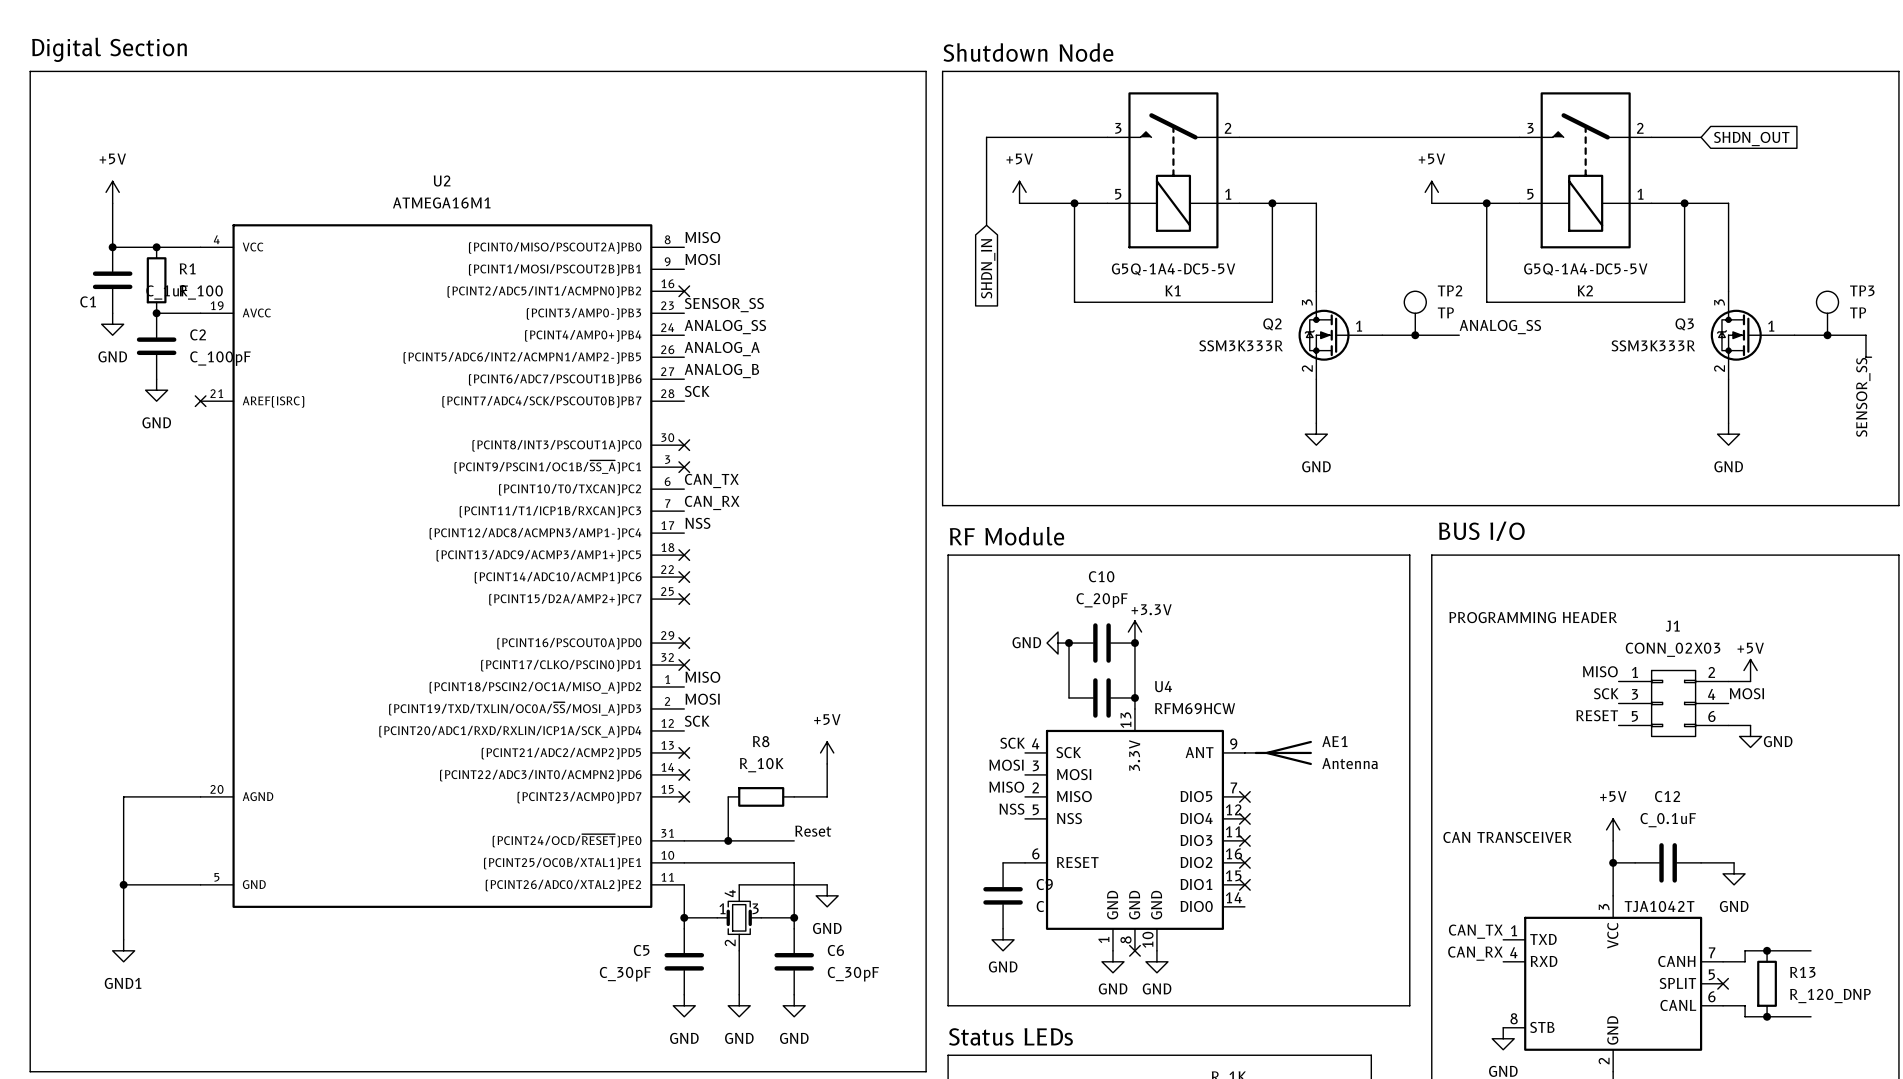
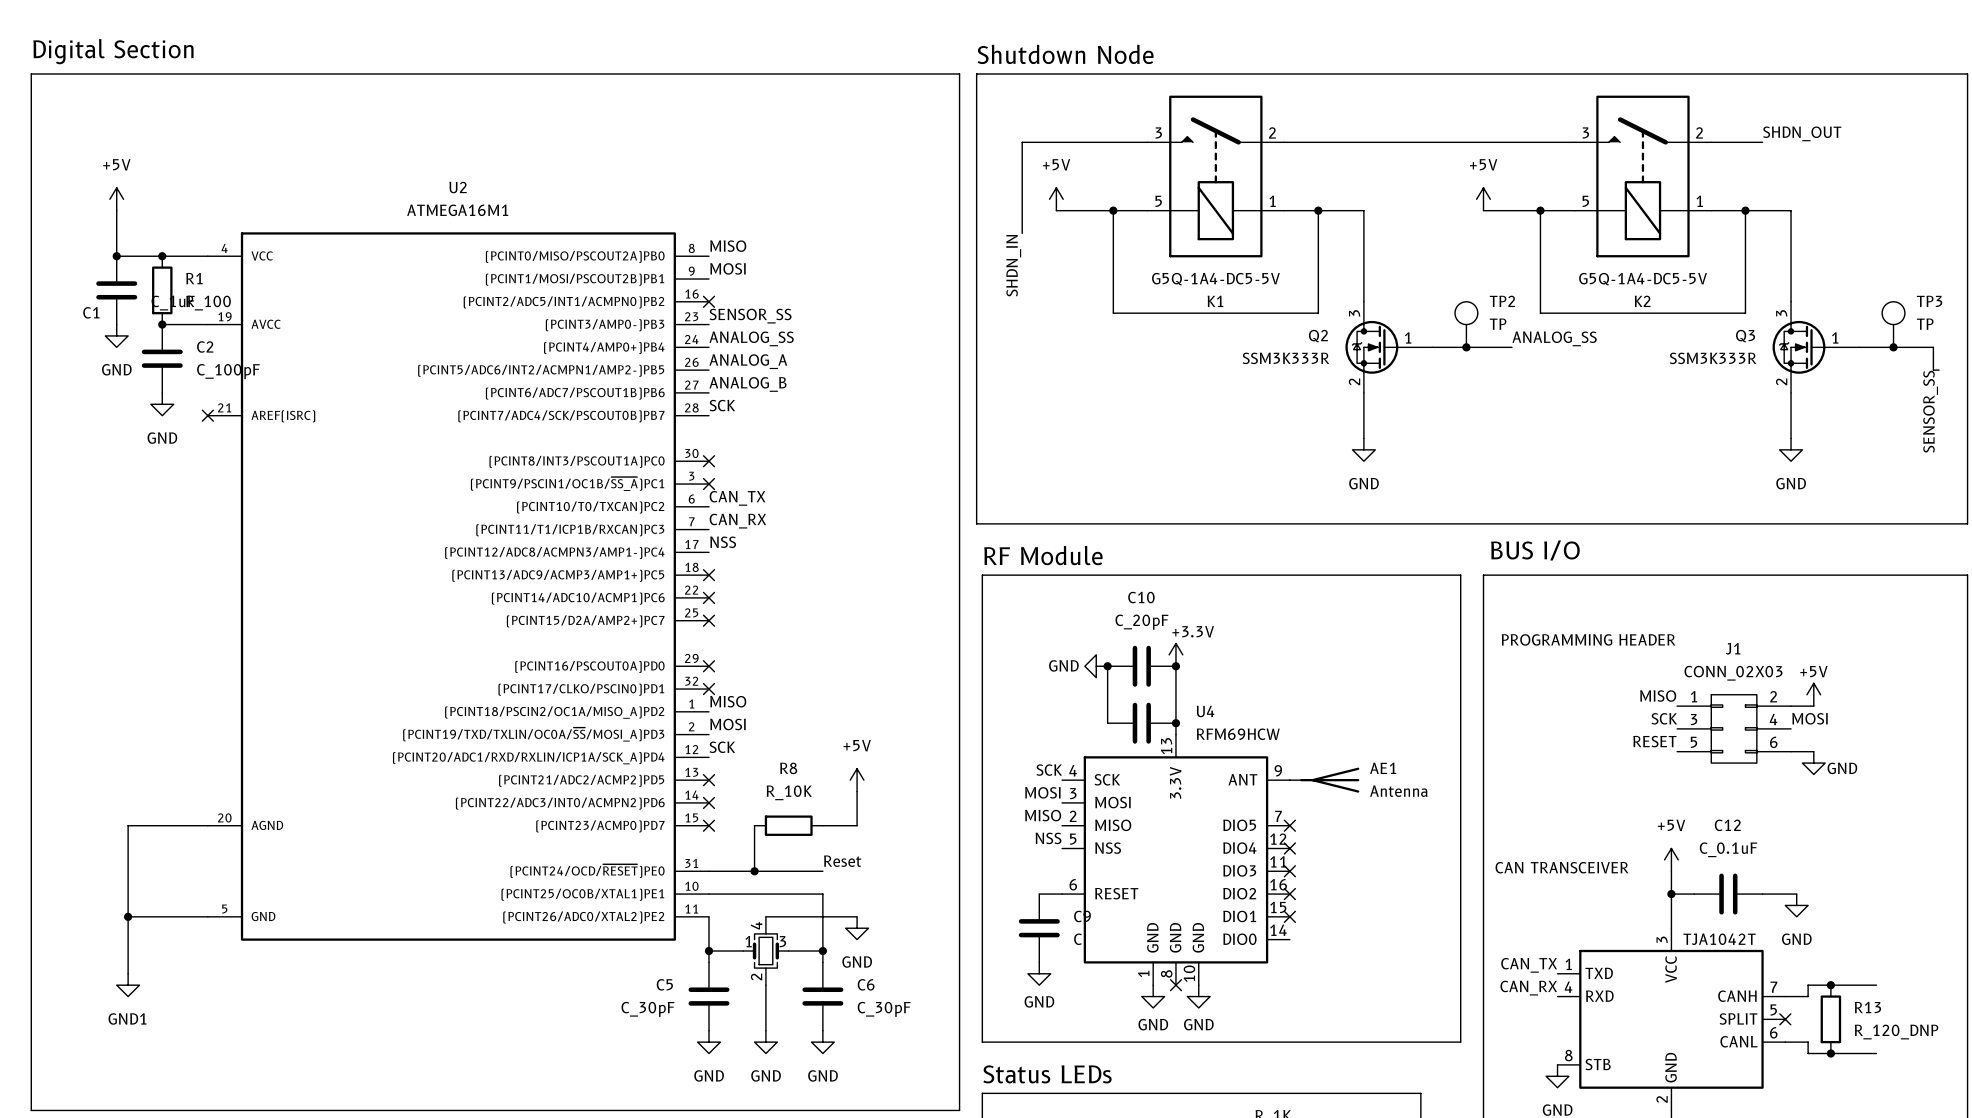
label: none -> SHDN_OUT (1802, 133)
global label: SHDN_OUT (1751, 139) -> none
label: none -> SHDN_IN (1013, 265)
global label: SHDN_IN (988, 268) -> none

